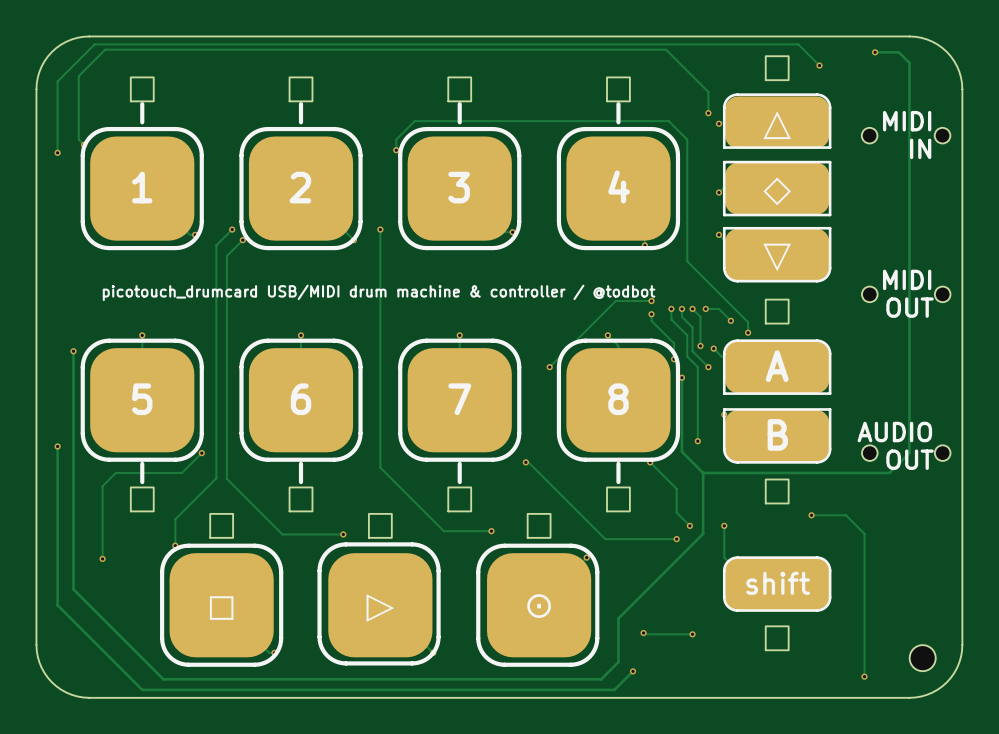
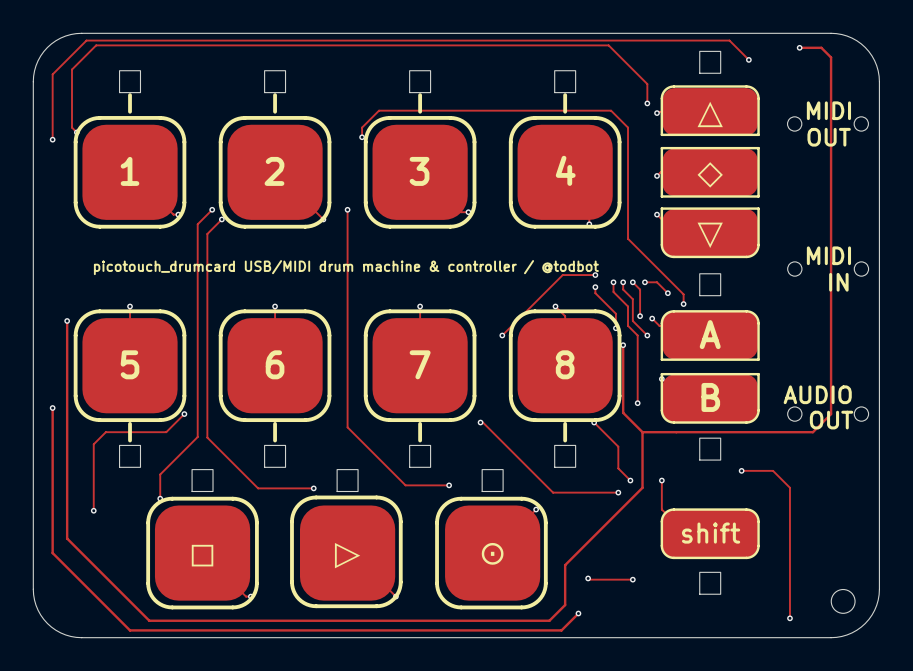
text position: IN (920, 148) -> IN (838, 282)
text position: OUT (910, 307) -> OUT (829, 137)

